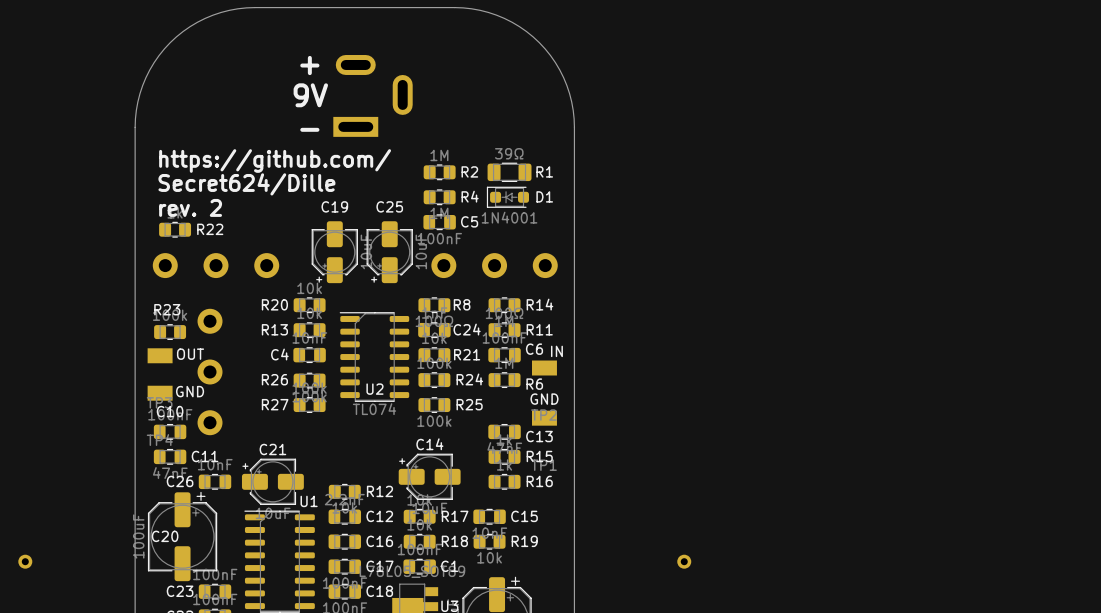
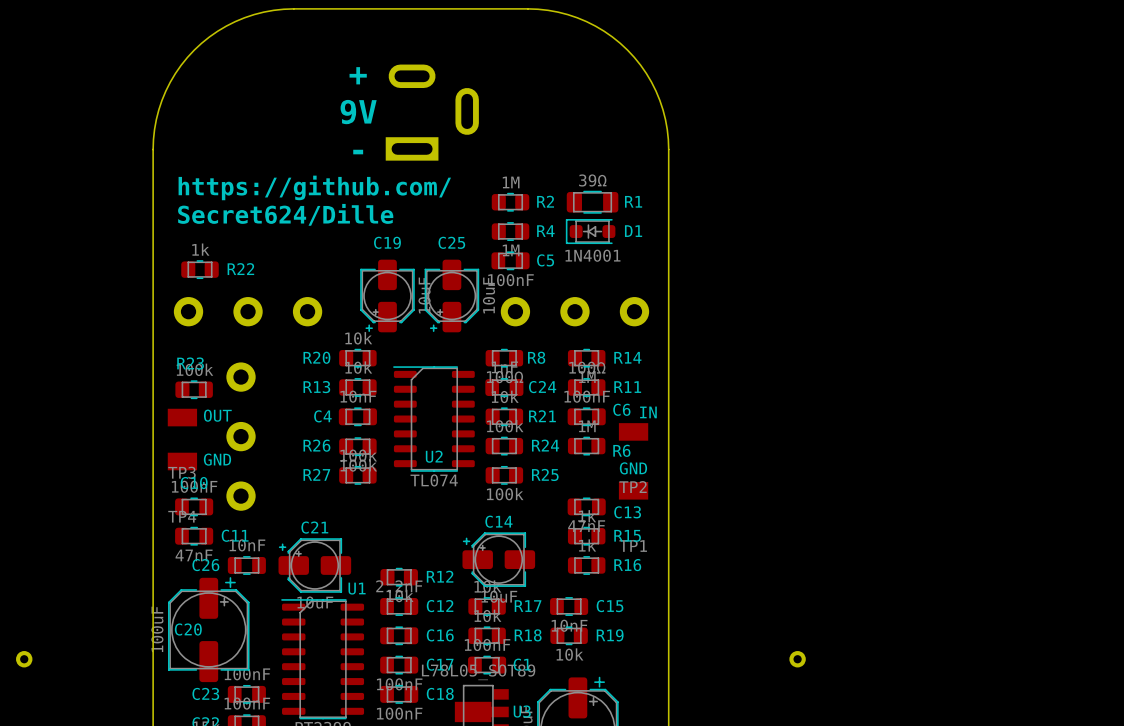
text: rev. 2 (190, 207) -> none

